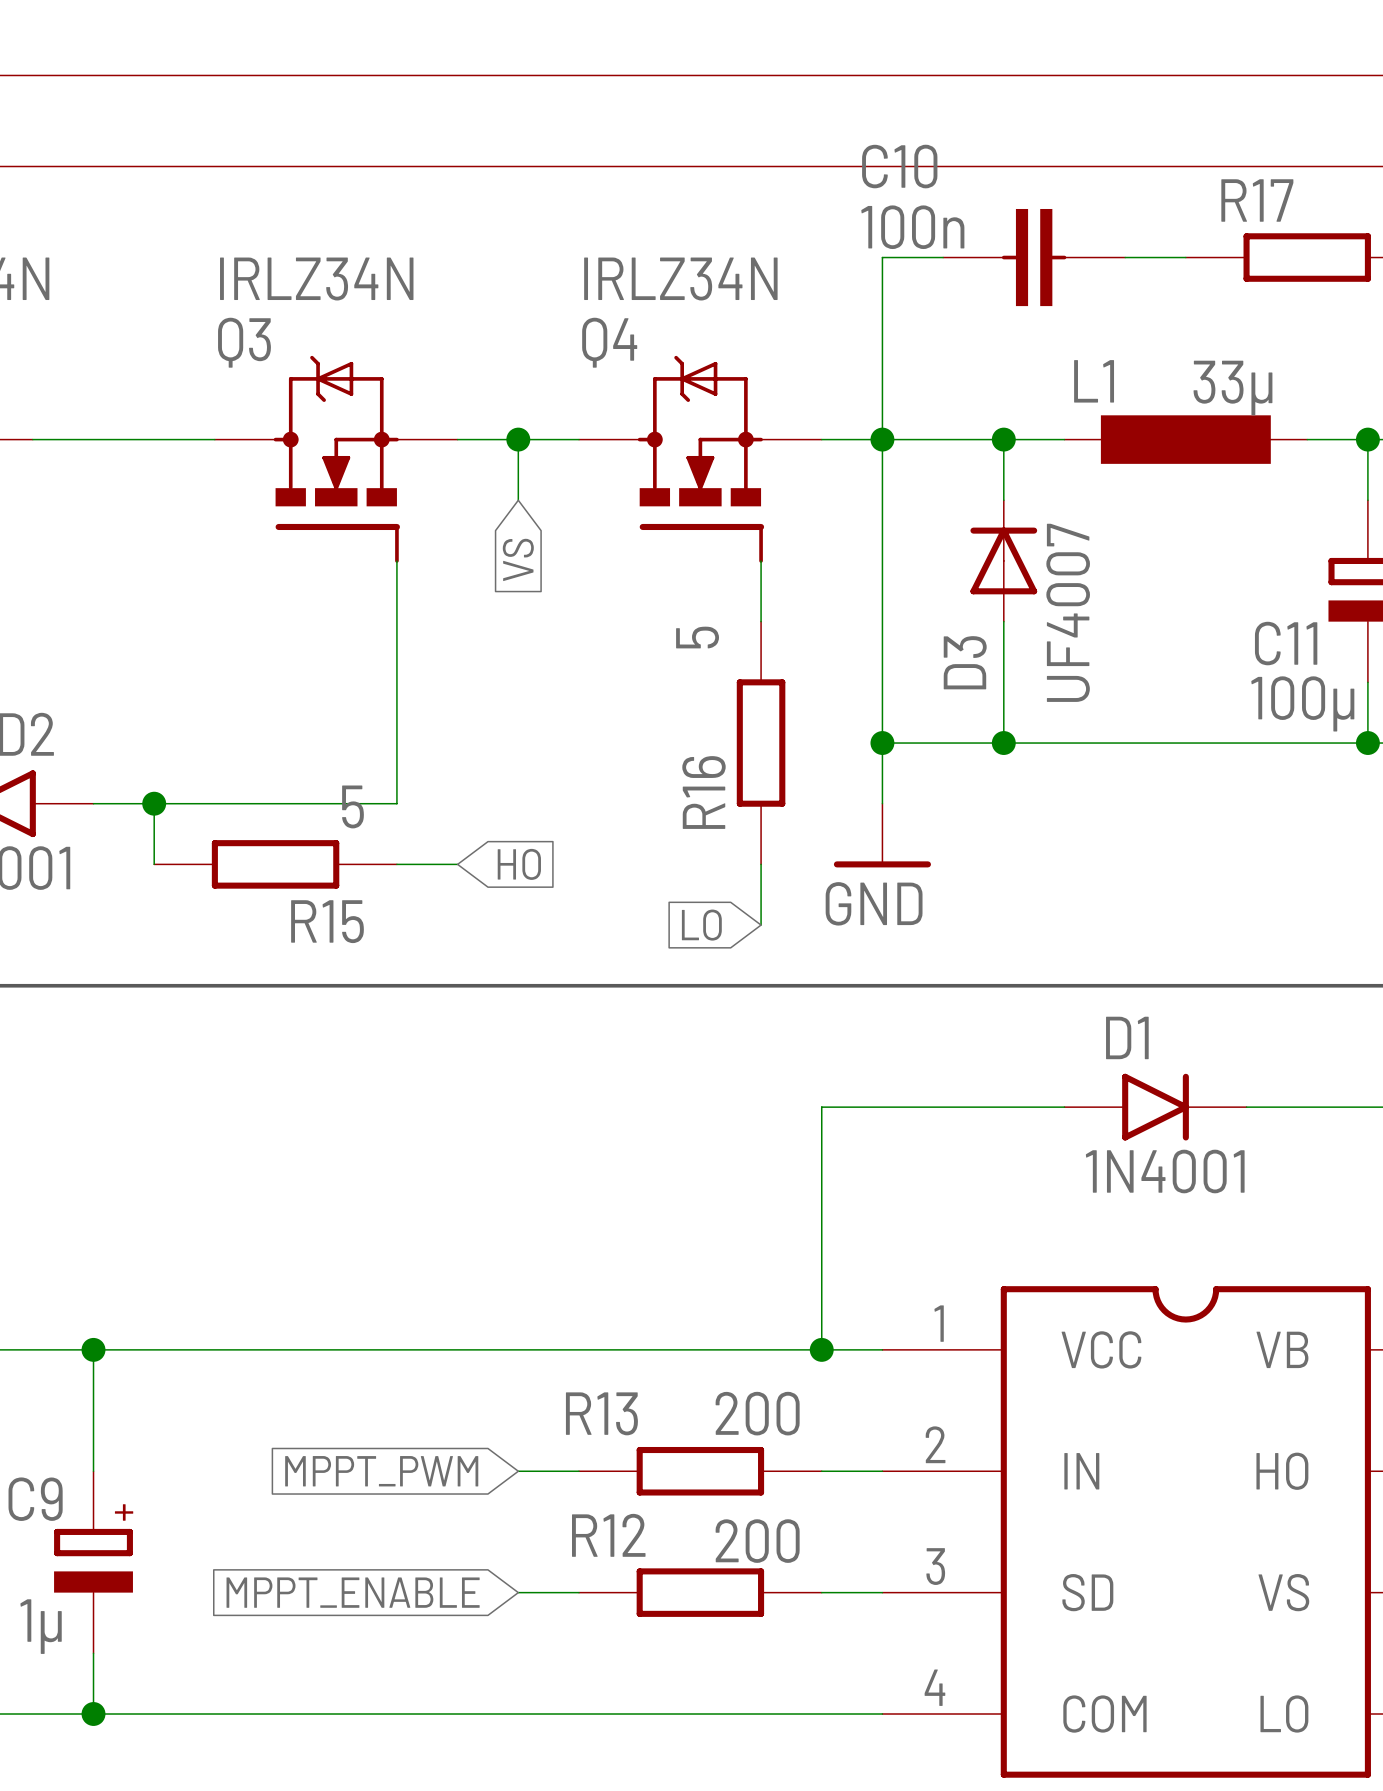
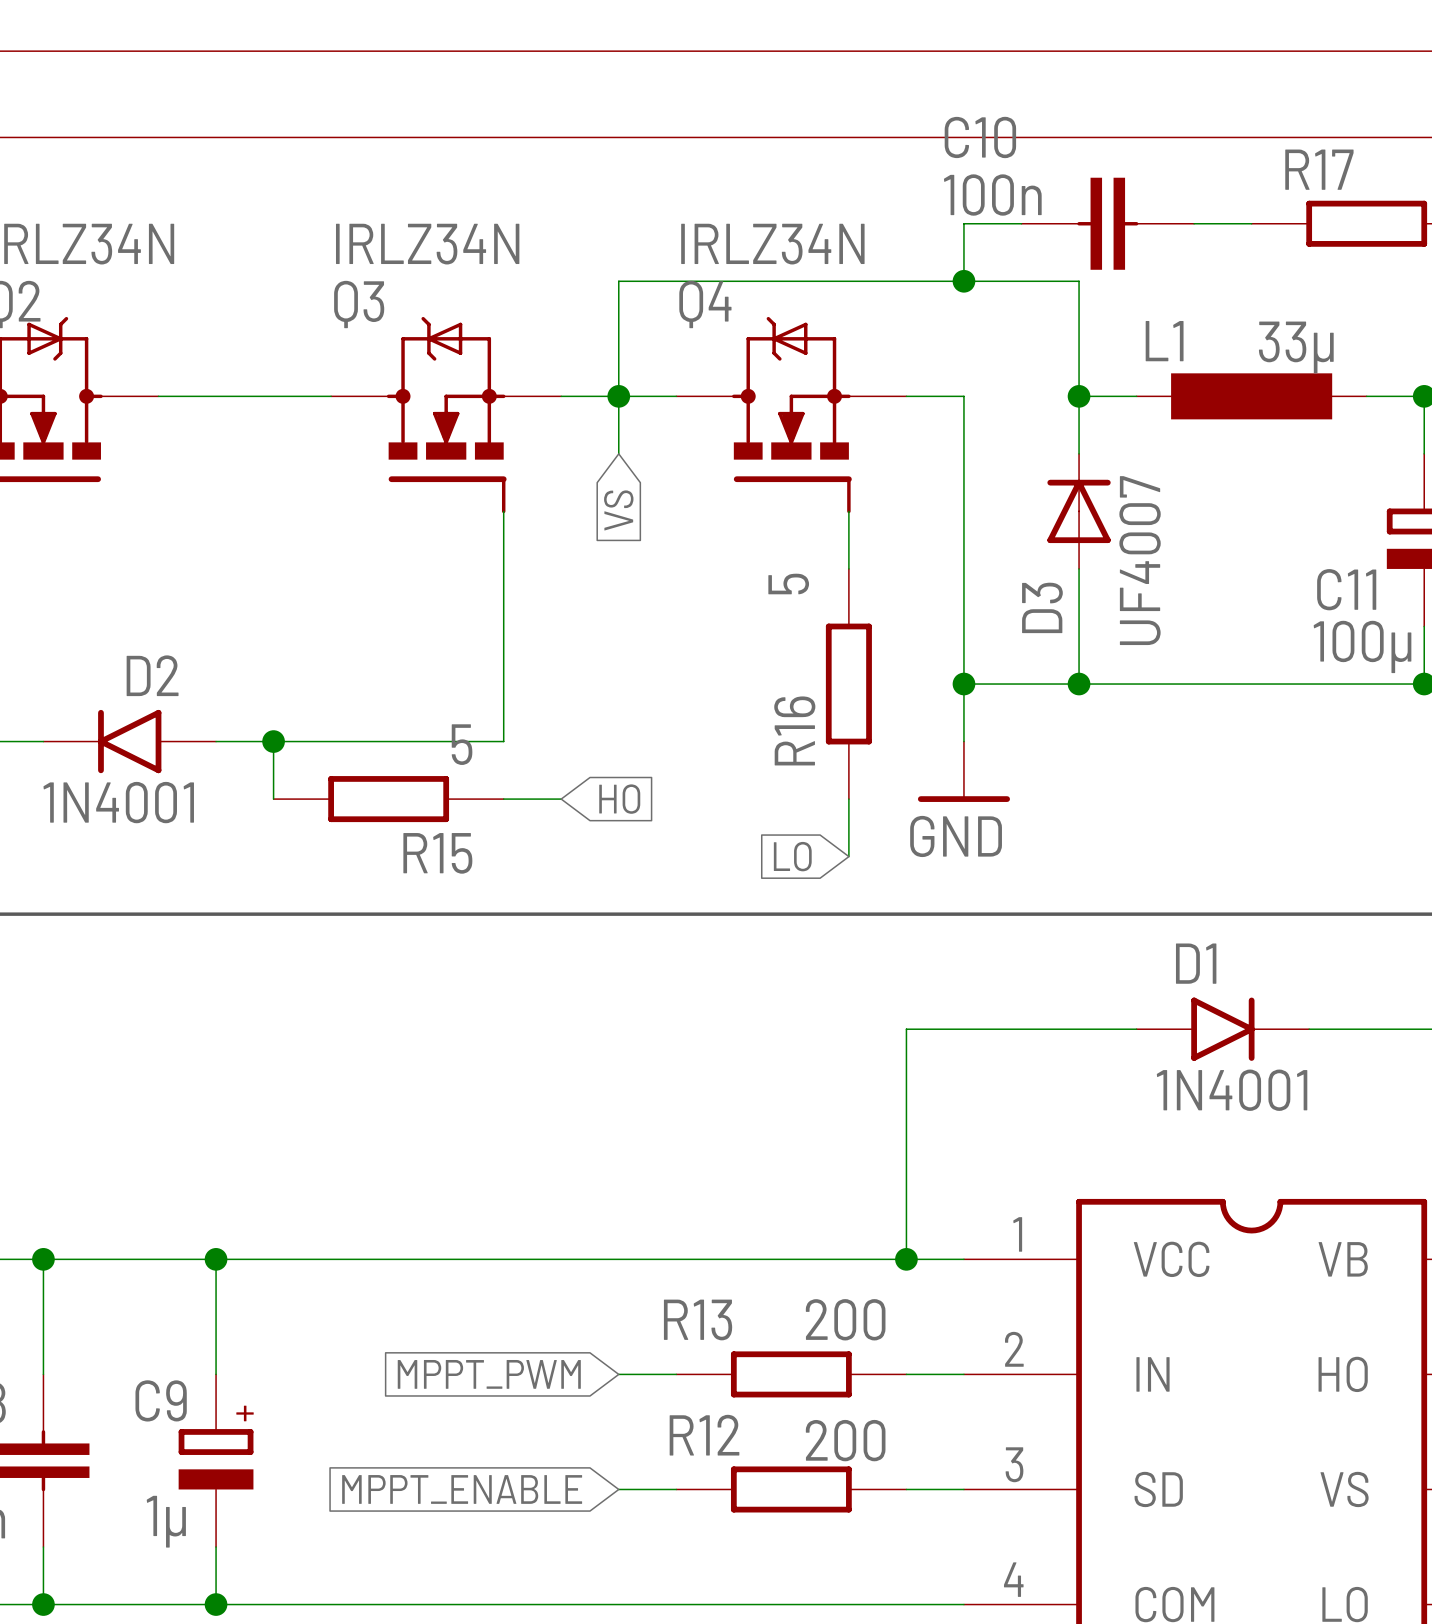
wire: (882, 318) (882, 439) (1003, 439) -> (618, 396) (618, 281) (1079, 281) (1079, 396)
junction position: (882, 439) -> (963, 281)

